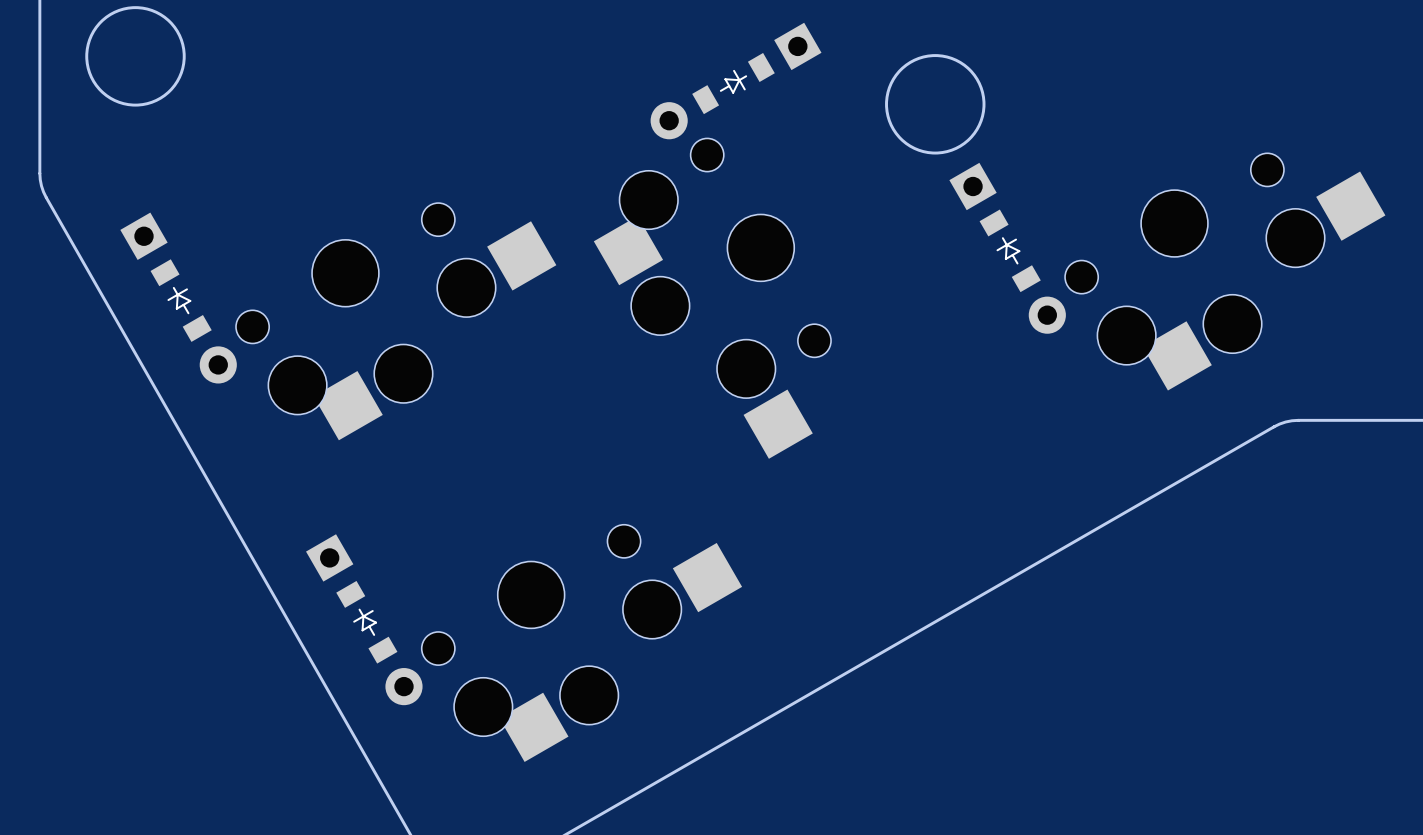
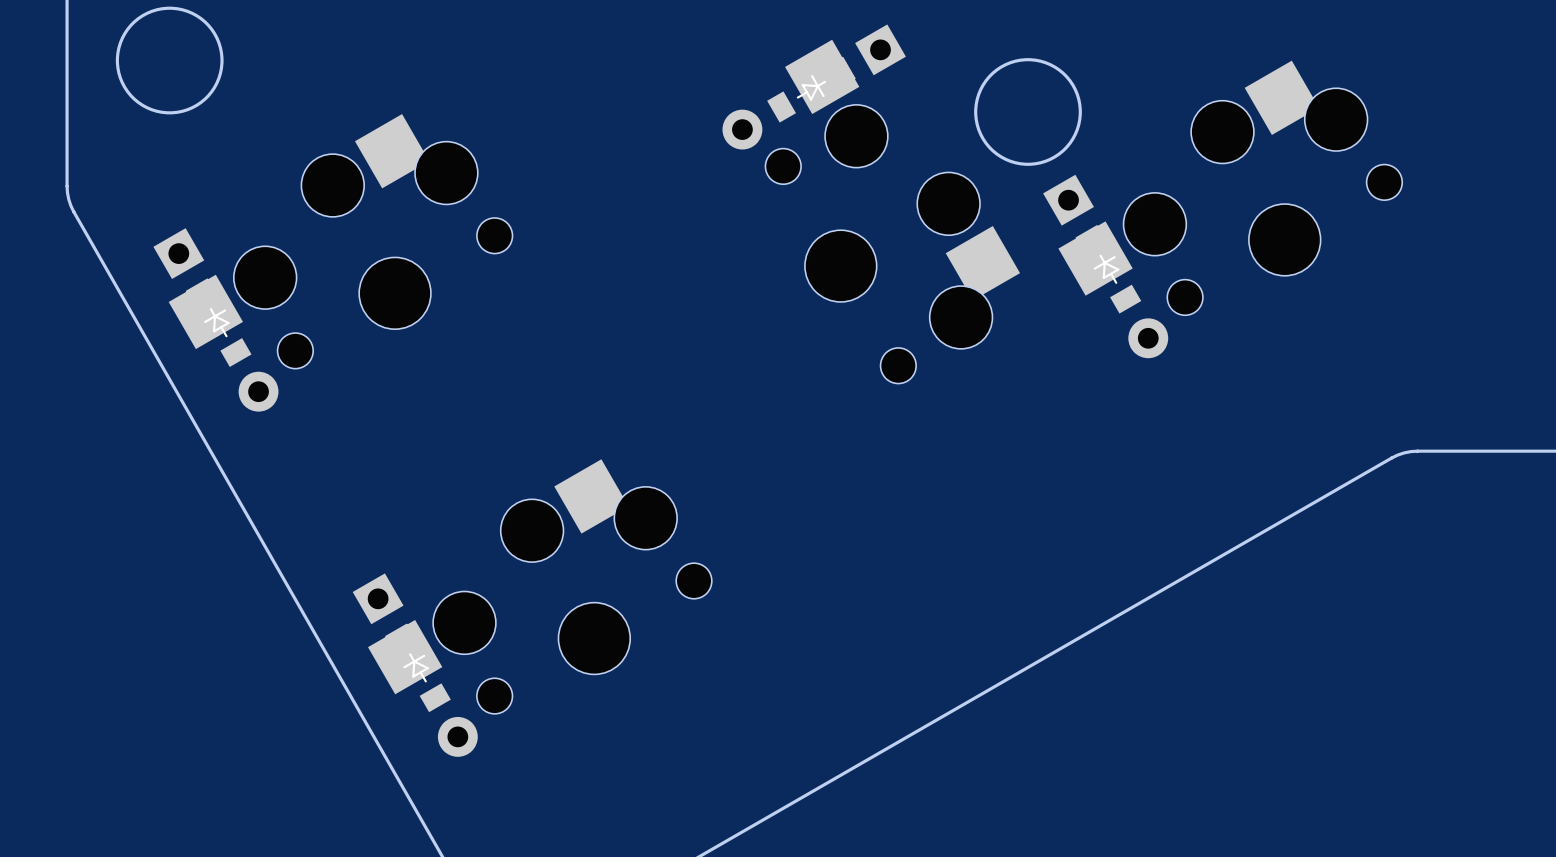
part: none -> (340, 241)
part rotation: 0° (1225, 271) -> 180° (1230, 187)
part rotation: 0° (712, 298) -> 180° (892, 211)
part: (396, 321) -> none
part: none -> (539, 586)
part: (581, 643) -> none

